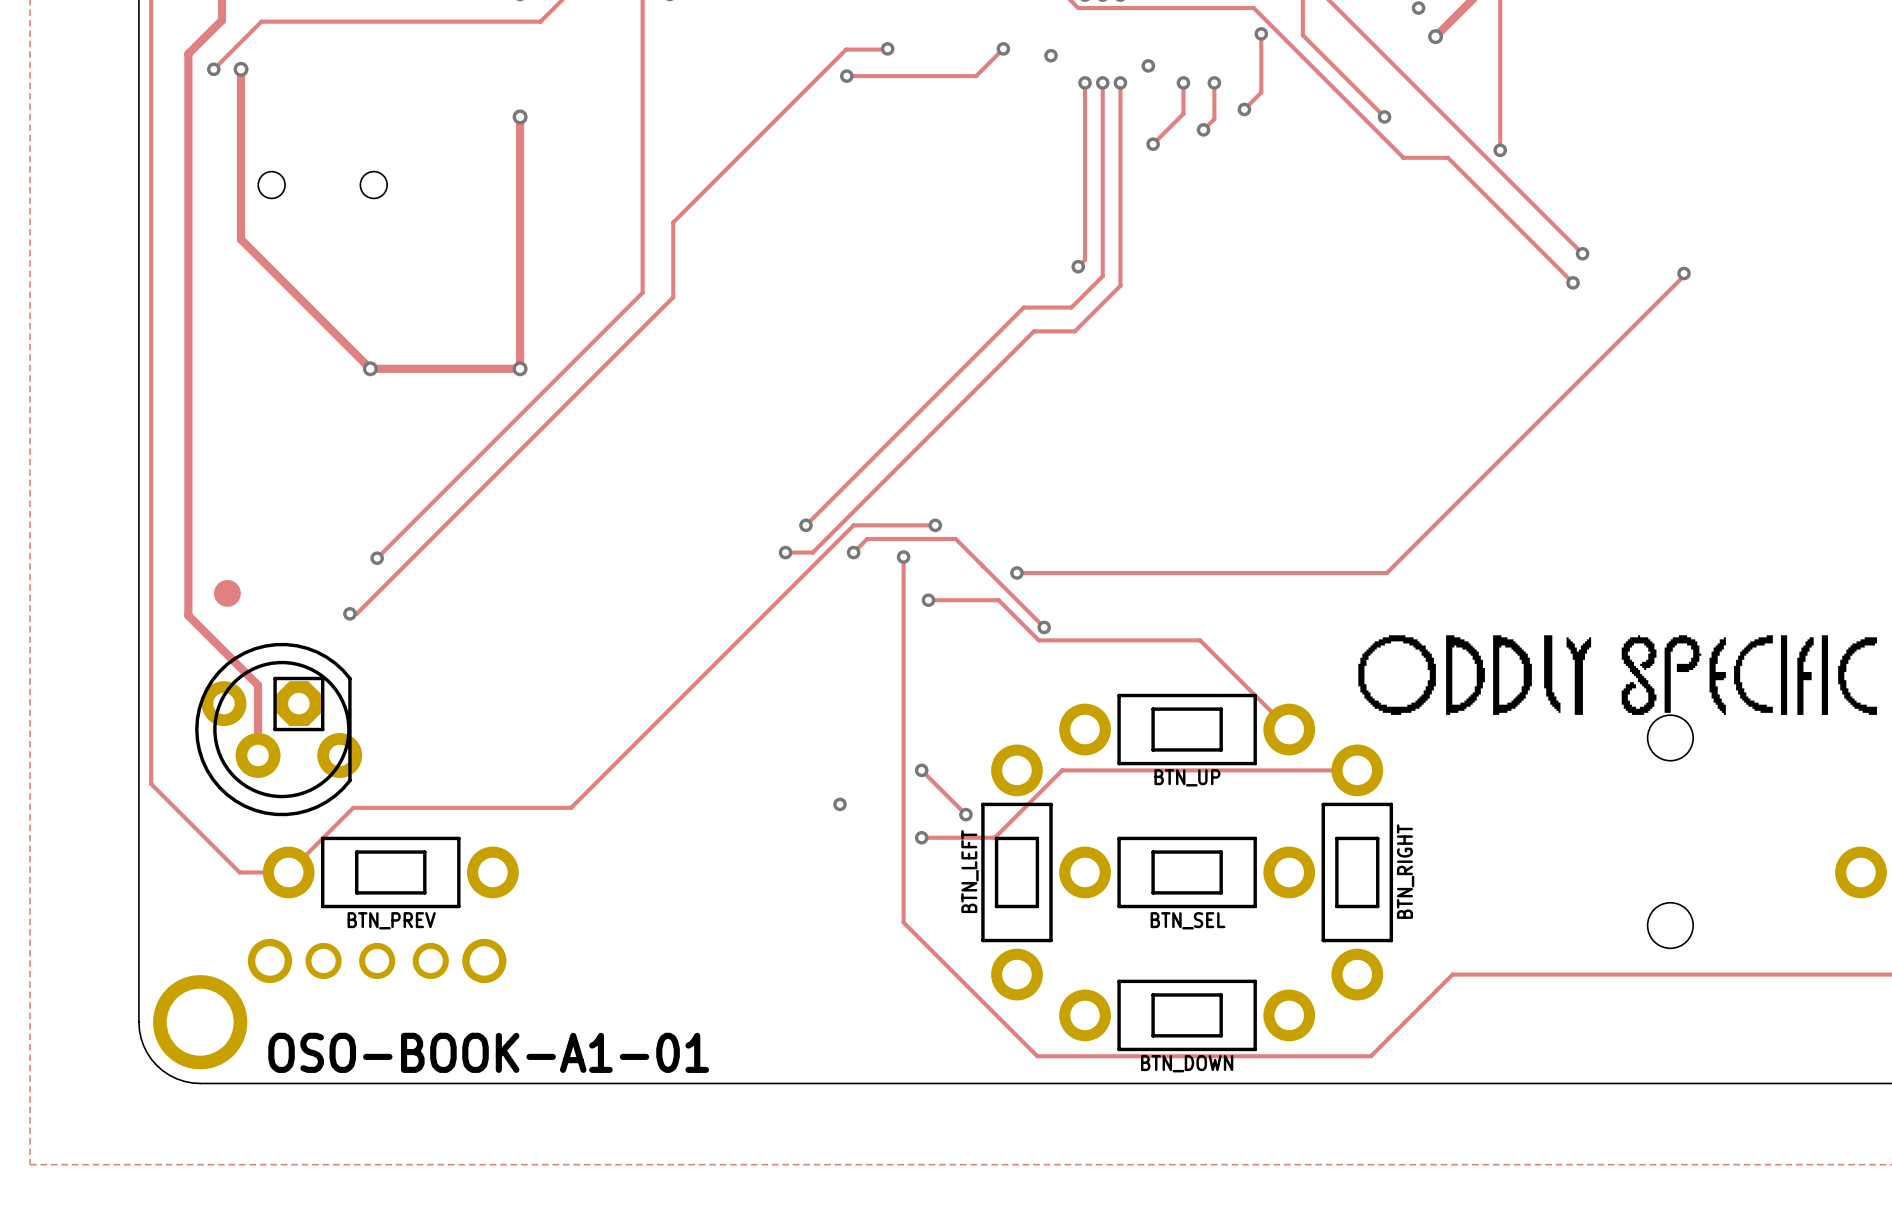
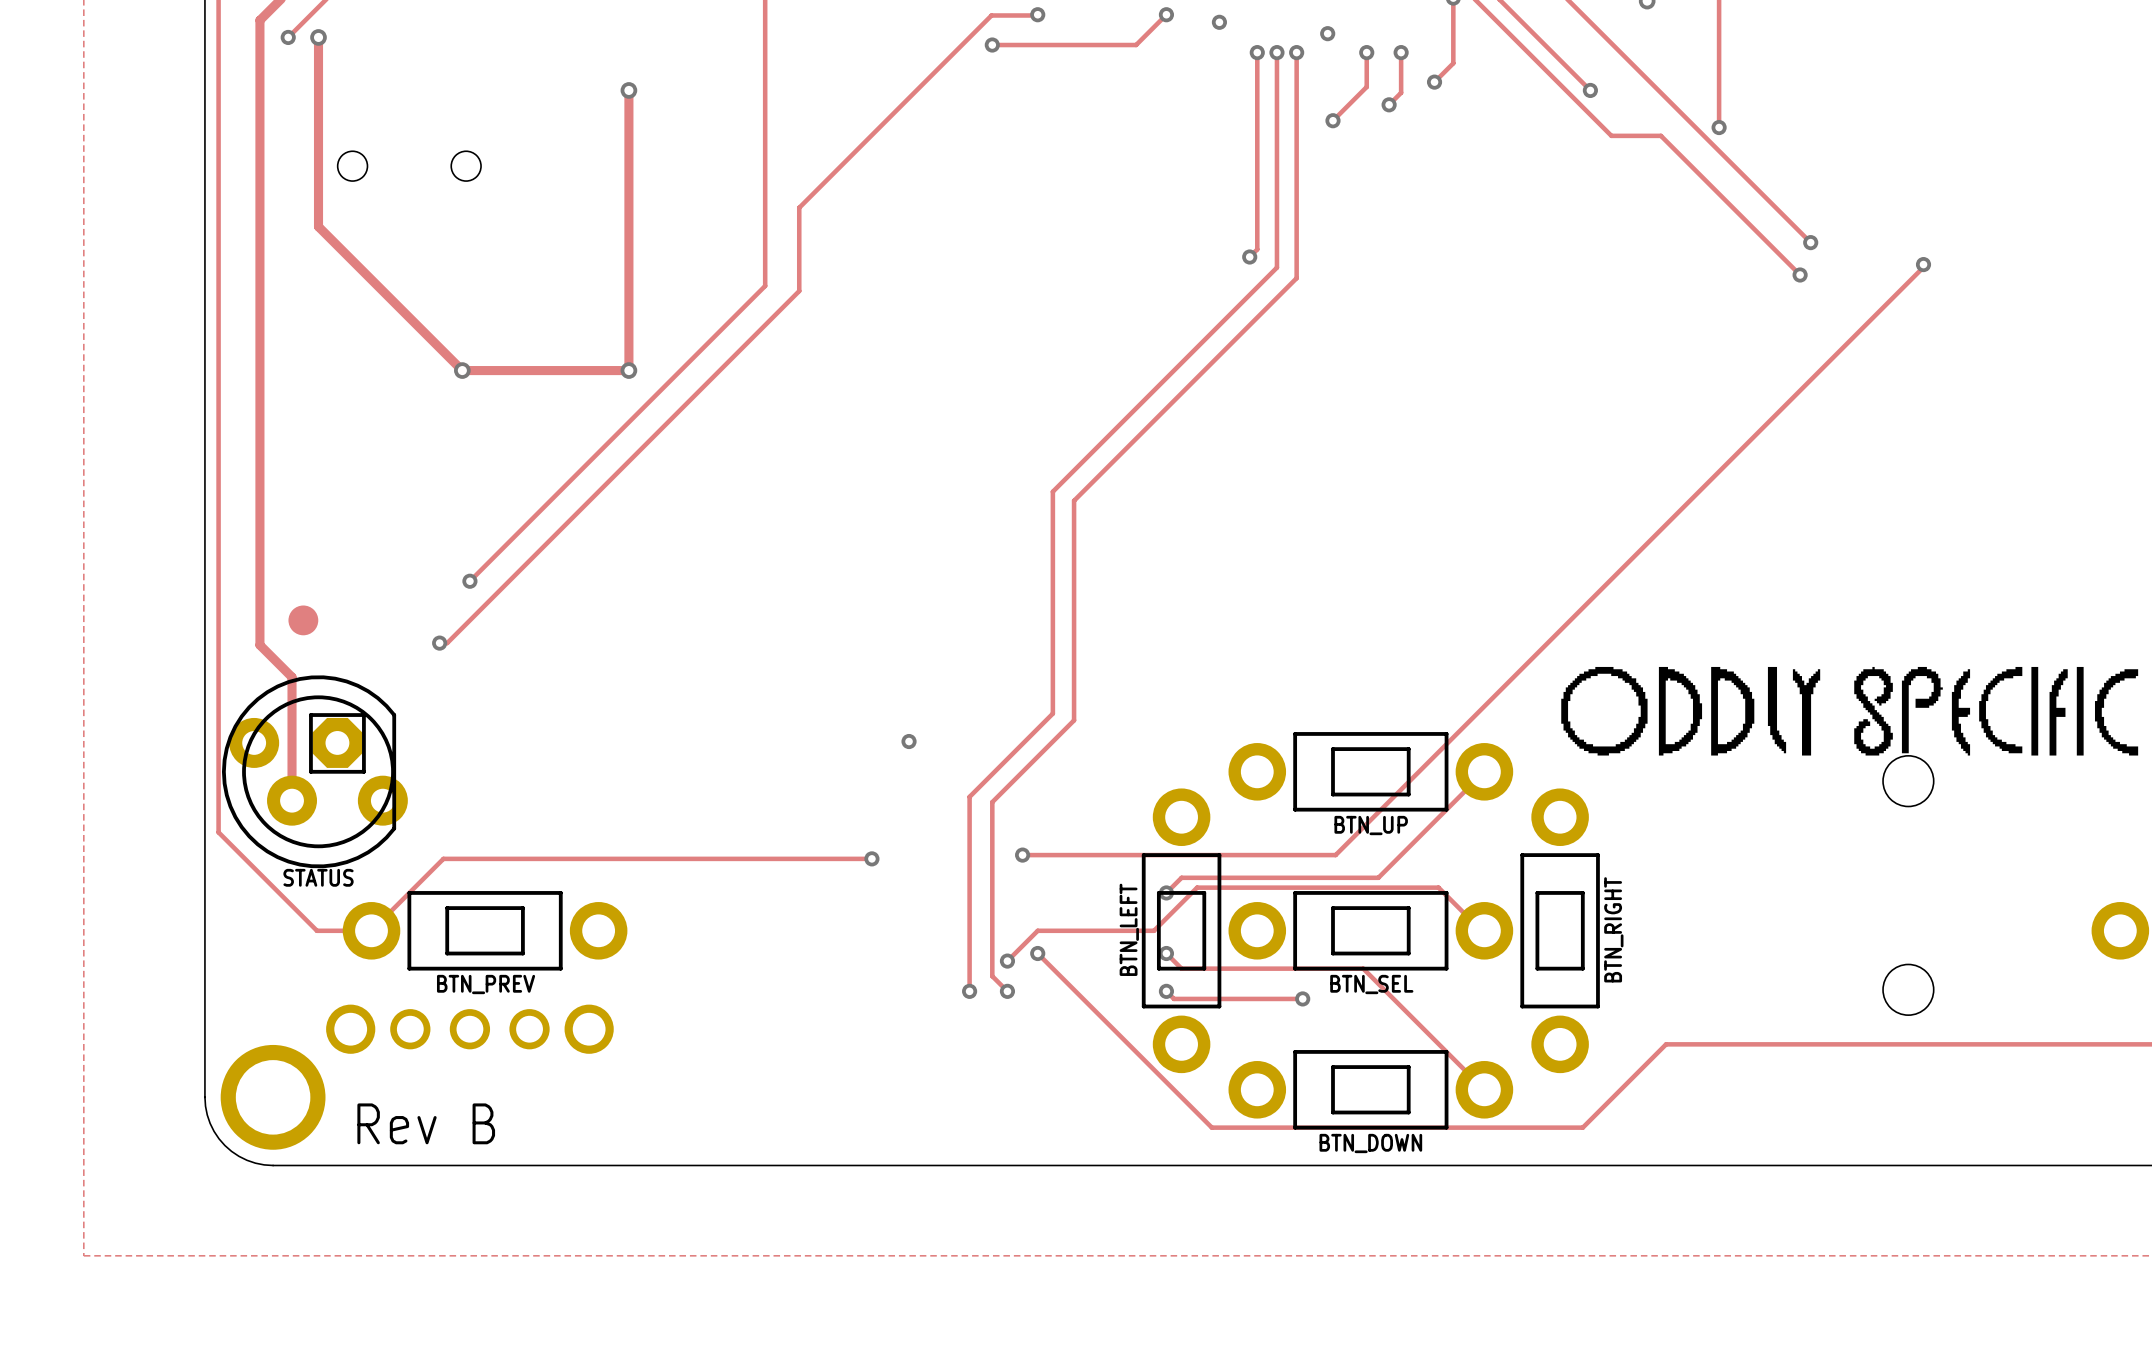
track: (1071, 307) (1023, 307) (805, 525) -> (1242, 302) (1052, 491) (1052, 713) (969, 796) (969, 991)
track: (1074, 331) (1033, 331) (812, 552) (785, 552) -> (1245, 328) (1074, 500) (1074, 720) (992, 802) (992, 976) (1007, 991)
via: (805, 525) -> none
track: (935, 525) (853, 525) (571, 807) -> (871, 858) (685, 858)
via: (935, 525) -> none
via: (785, 552) -> none
track: (853, 552) (867, 538) (955, 538) (1044, 627) -> none
via: (853, 552) -> none
track: (903, 557) (903, 922) (1037, 1056) (1370, 1056) (1377, 1049) -> (1037, 953) (1211, 1127) (1582, 1127)
via: (903, 557) -> none
track: (1016, 572) (1386, 572) -> (1022, 855) (1335, 855) (1593, 597)
via: (1016, 572) -> none
track: (928, 600) (998, 600) (1038, 640) (1200, 640) (1289, 729) -> (1166, 892) (1181, 877) (1378, 877) (1484, 771)
via: (928, 600) -> none
via: (1044, 627) -> none
track: (217, 644) (258, 685) (258, 755) -> (292, 677) (292, 800)
via: none -> (909, 741)
STATUS: none -> (314, 771)
part: (278, 729) -> none
track: (921, 770) (965, 814) -> none
via: (921, 770) -> none
track: (1357, 770) (1062, 770) (994, 837) (921, 837) -> none
via: (840, 804) -> none
via: none -> (1022, 855)
via: none -> (871, 858)
via: (965, 814) -> none
via: (921, 837) -> none
via: none -> (1166, 892)
track: none -> (1484, 930) (1481, 930) (1438, 887) (1197, 887) (1153, 930) (1037, 930) (1007, 961)
via: none -> (1037, 953)
track: none -> (1166, 953) (1181, 968) (1363, 968) (1484, 1089)
via: none -> (1166, 953)
via: none -> (1007, 961)
via: none -> (969, 991)
via: none -> (1007, 991)
track: none -> (1166, 991) (1174, 998) (1302, 998)
via: none -> (1166, 991)
via: none -> (1302, 998)
text: OSO-BOOK-A1-01 (488, 1052) -> Rev B (426, 1123)

